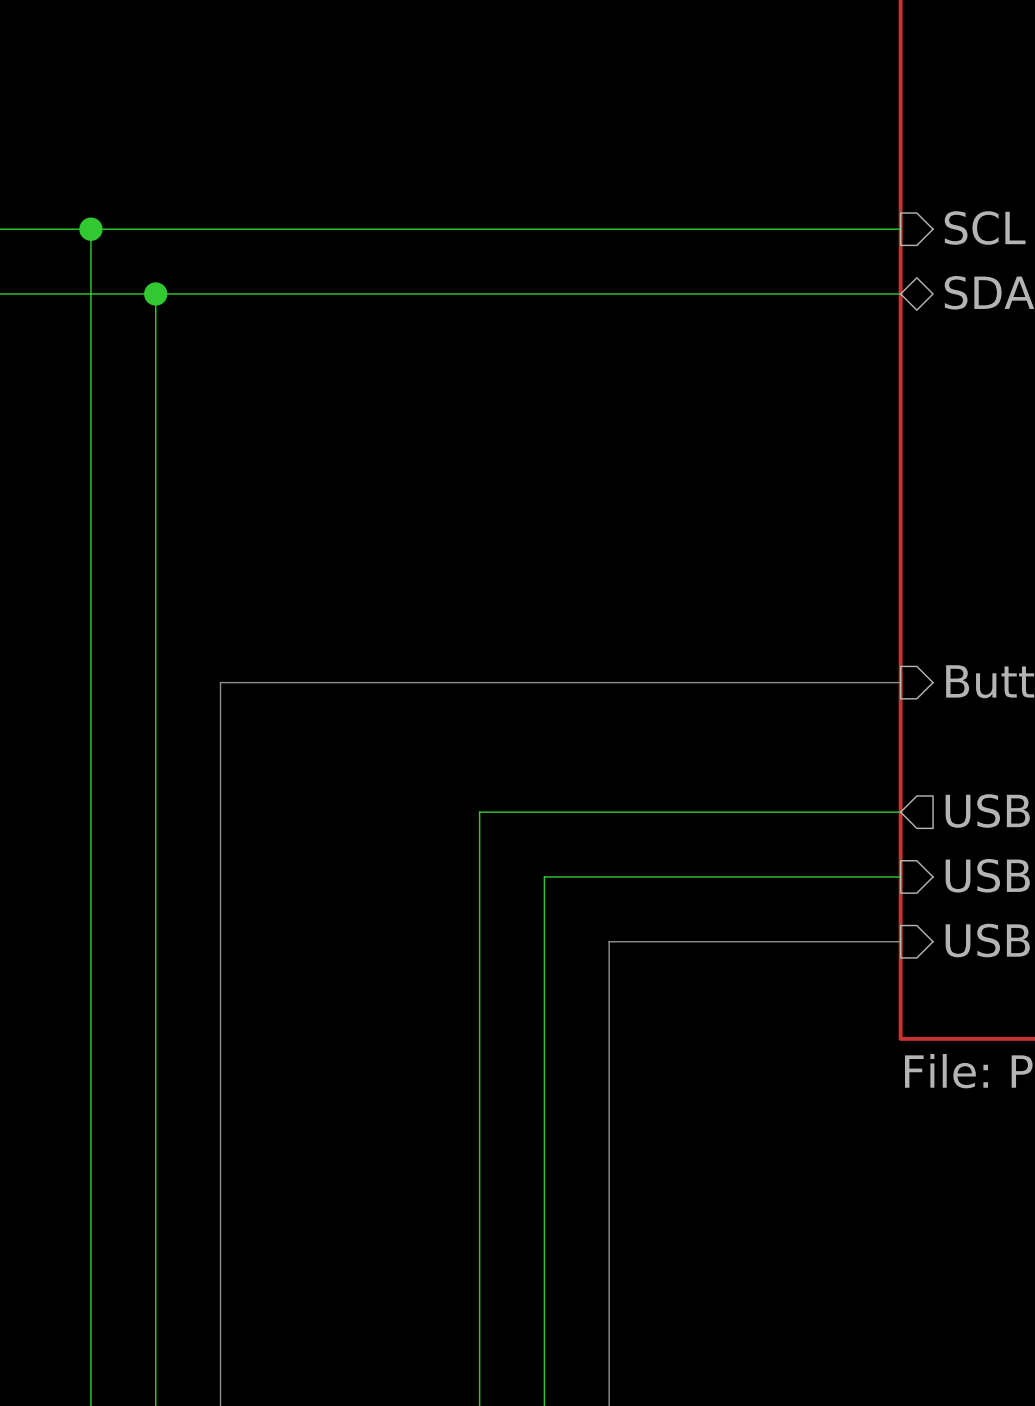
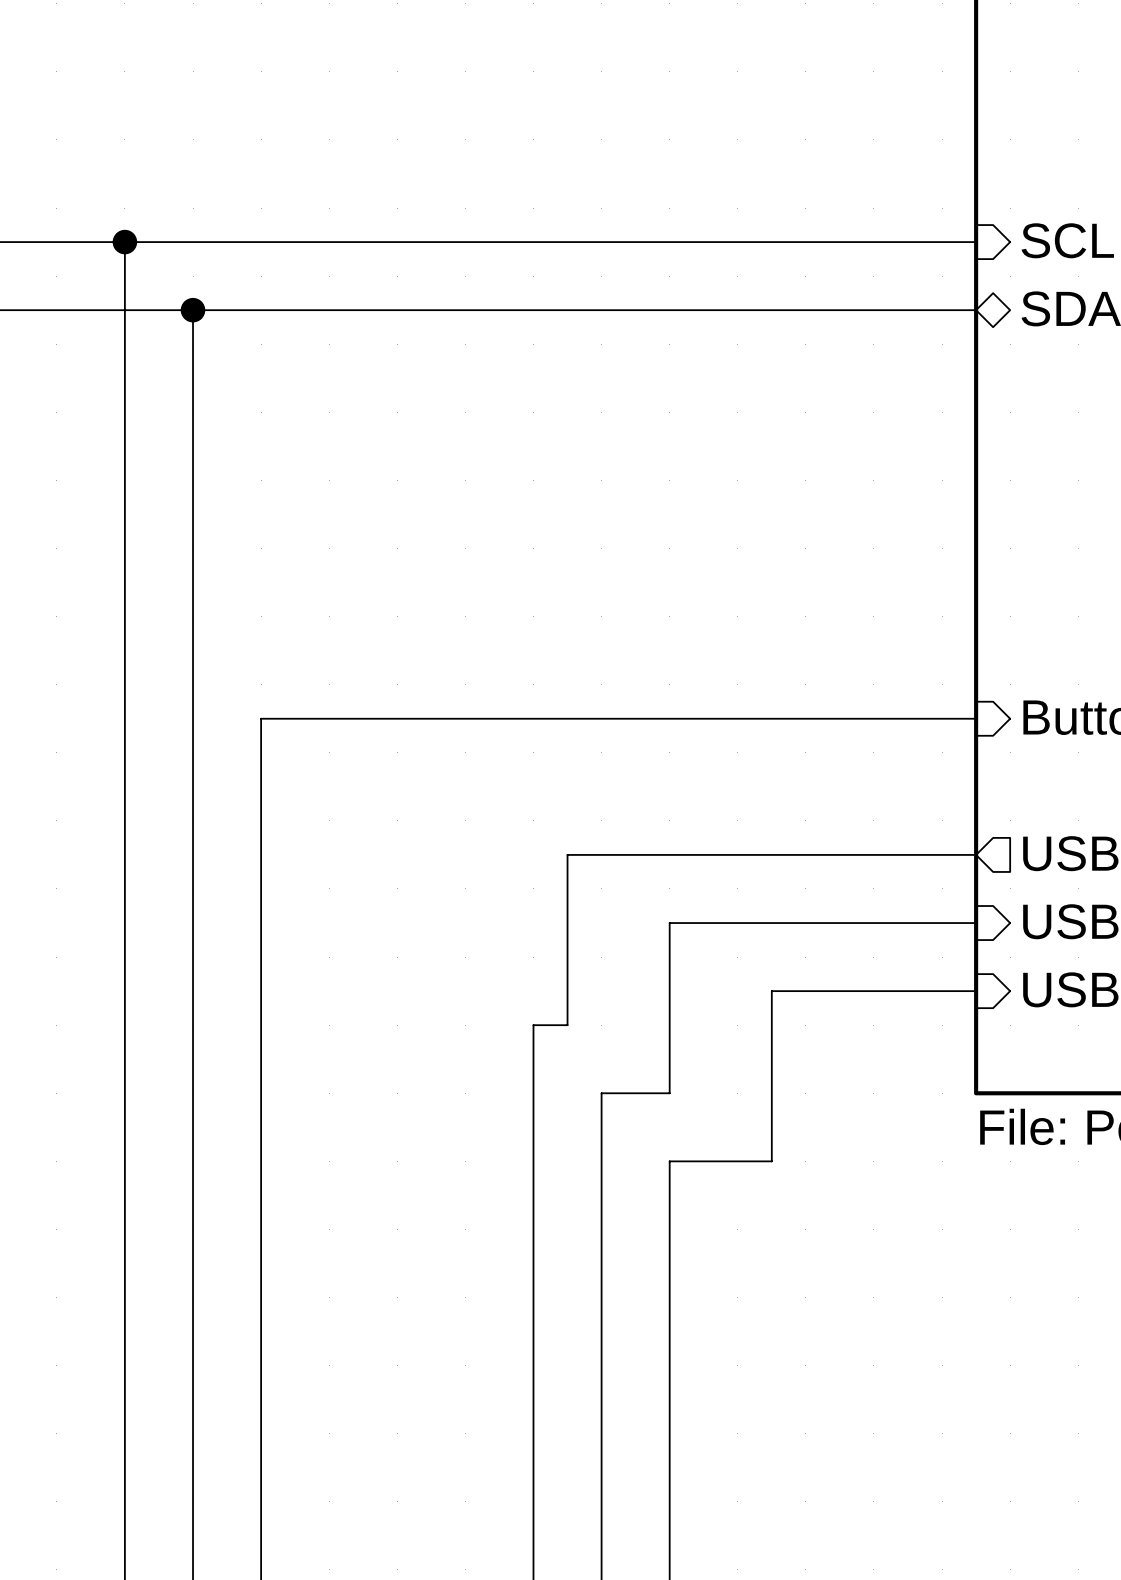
wire: (512, 812) (479, 812) (479, 974) -> (567, 854) (567, 1025) (533, 1025)
wire: (609, 876) (544, 876) (544, 1038) -> (669, 923) (669, 1093) (601, 1093)
bus: (706, 941) (609, 941) (609, 1103) -> (771, 991) (771, 1161) (669, 1161)

